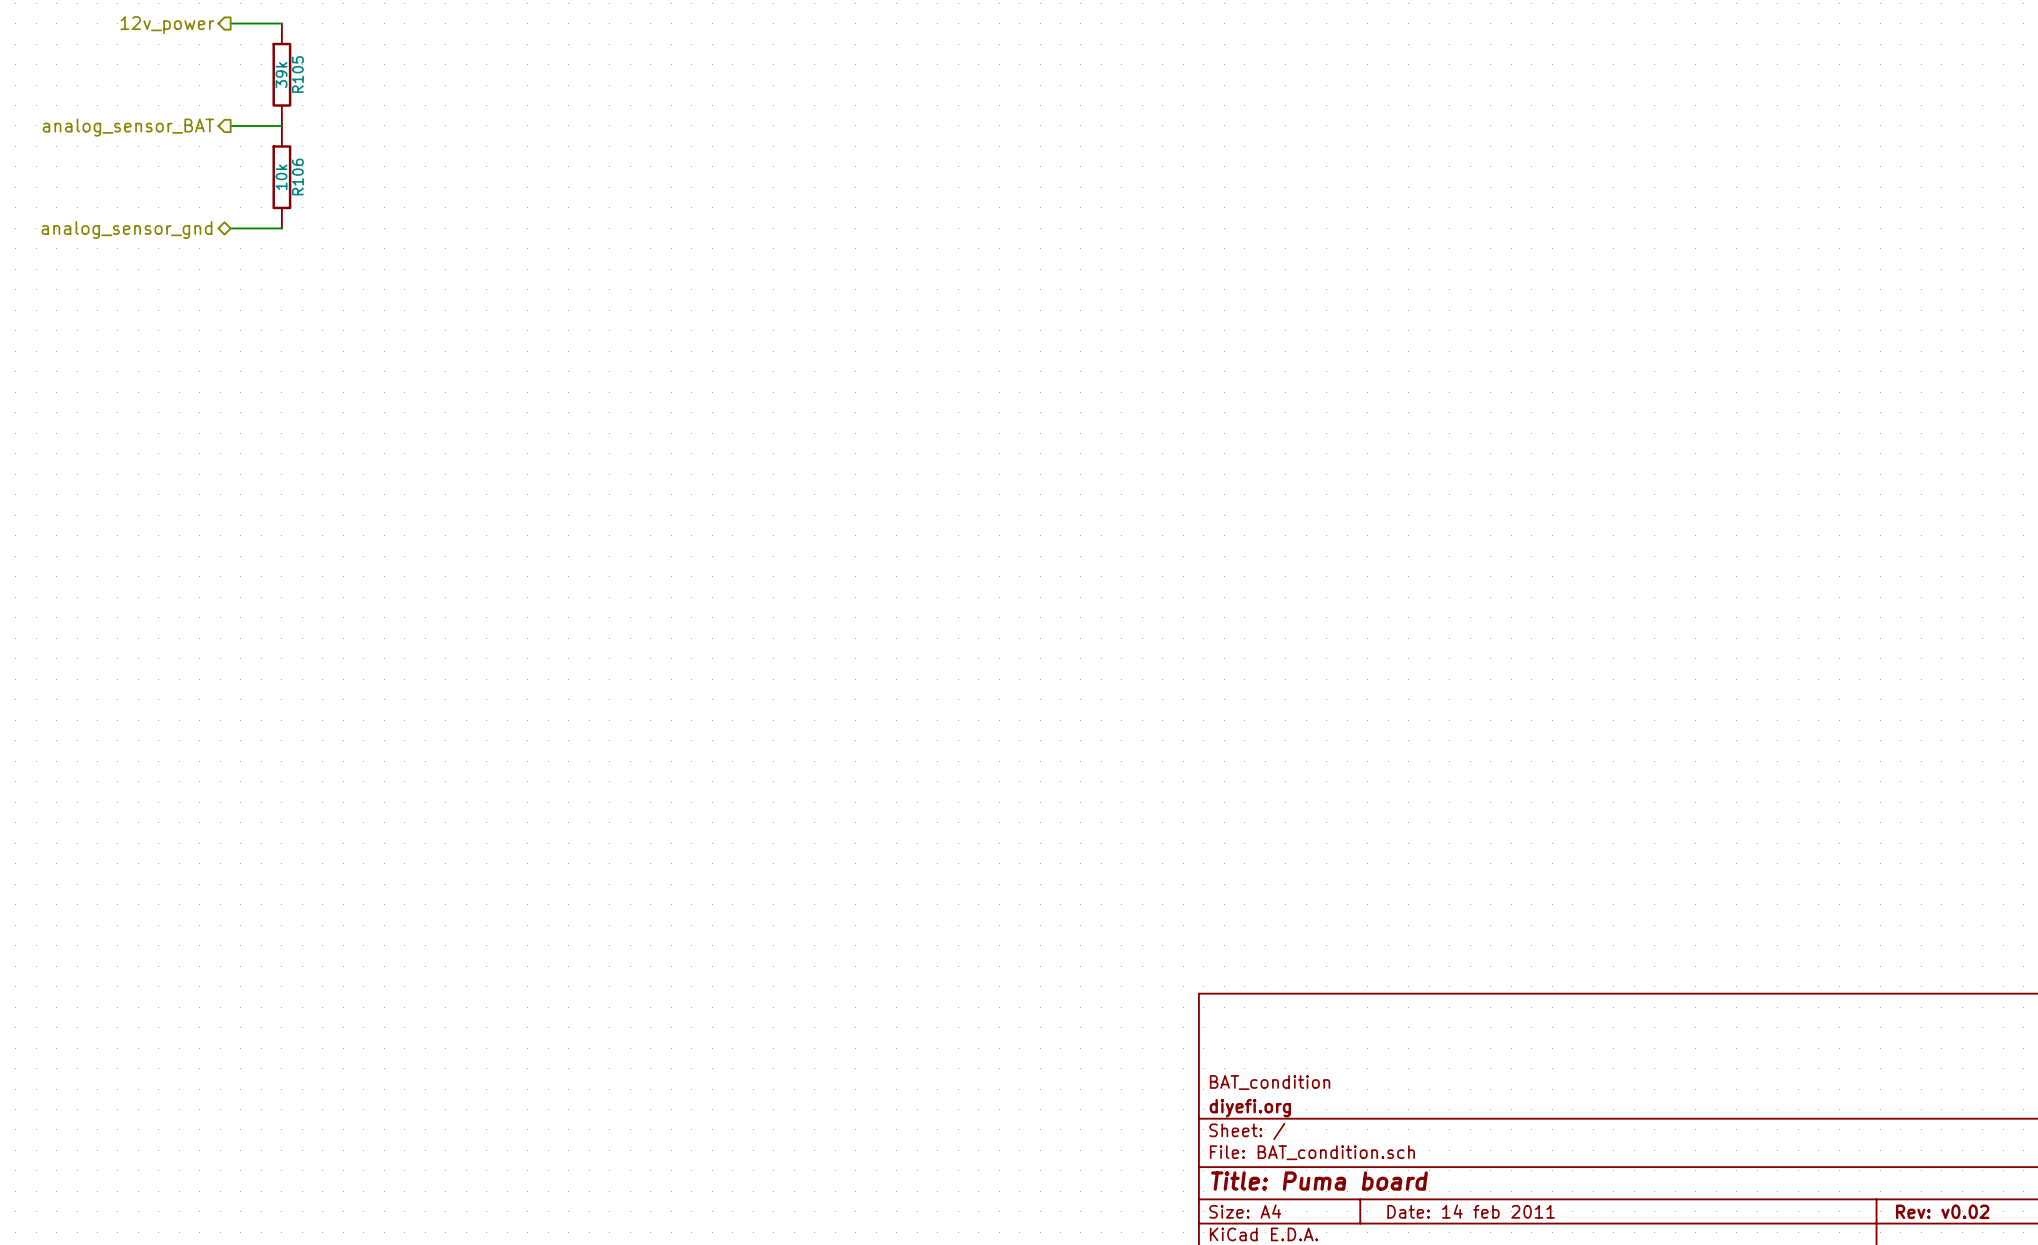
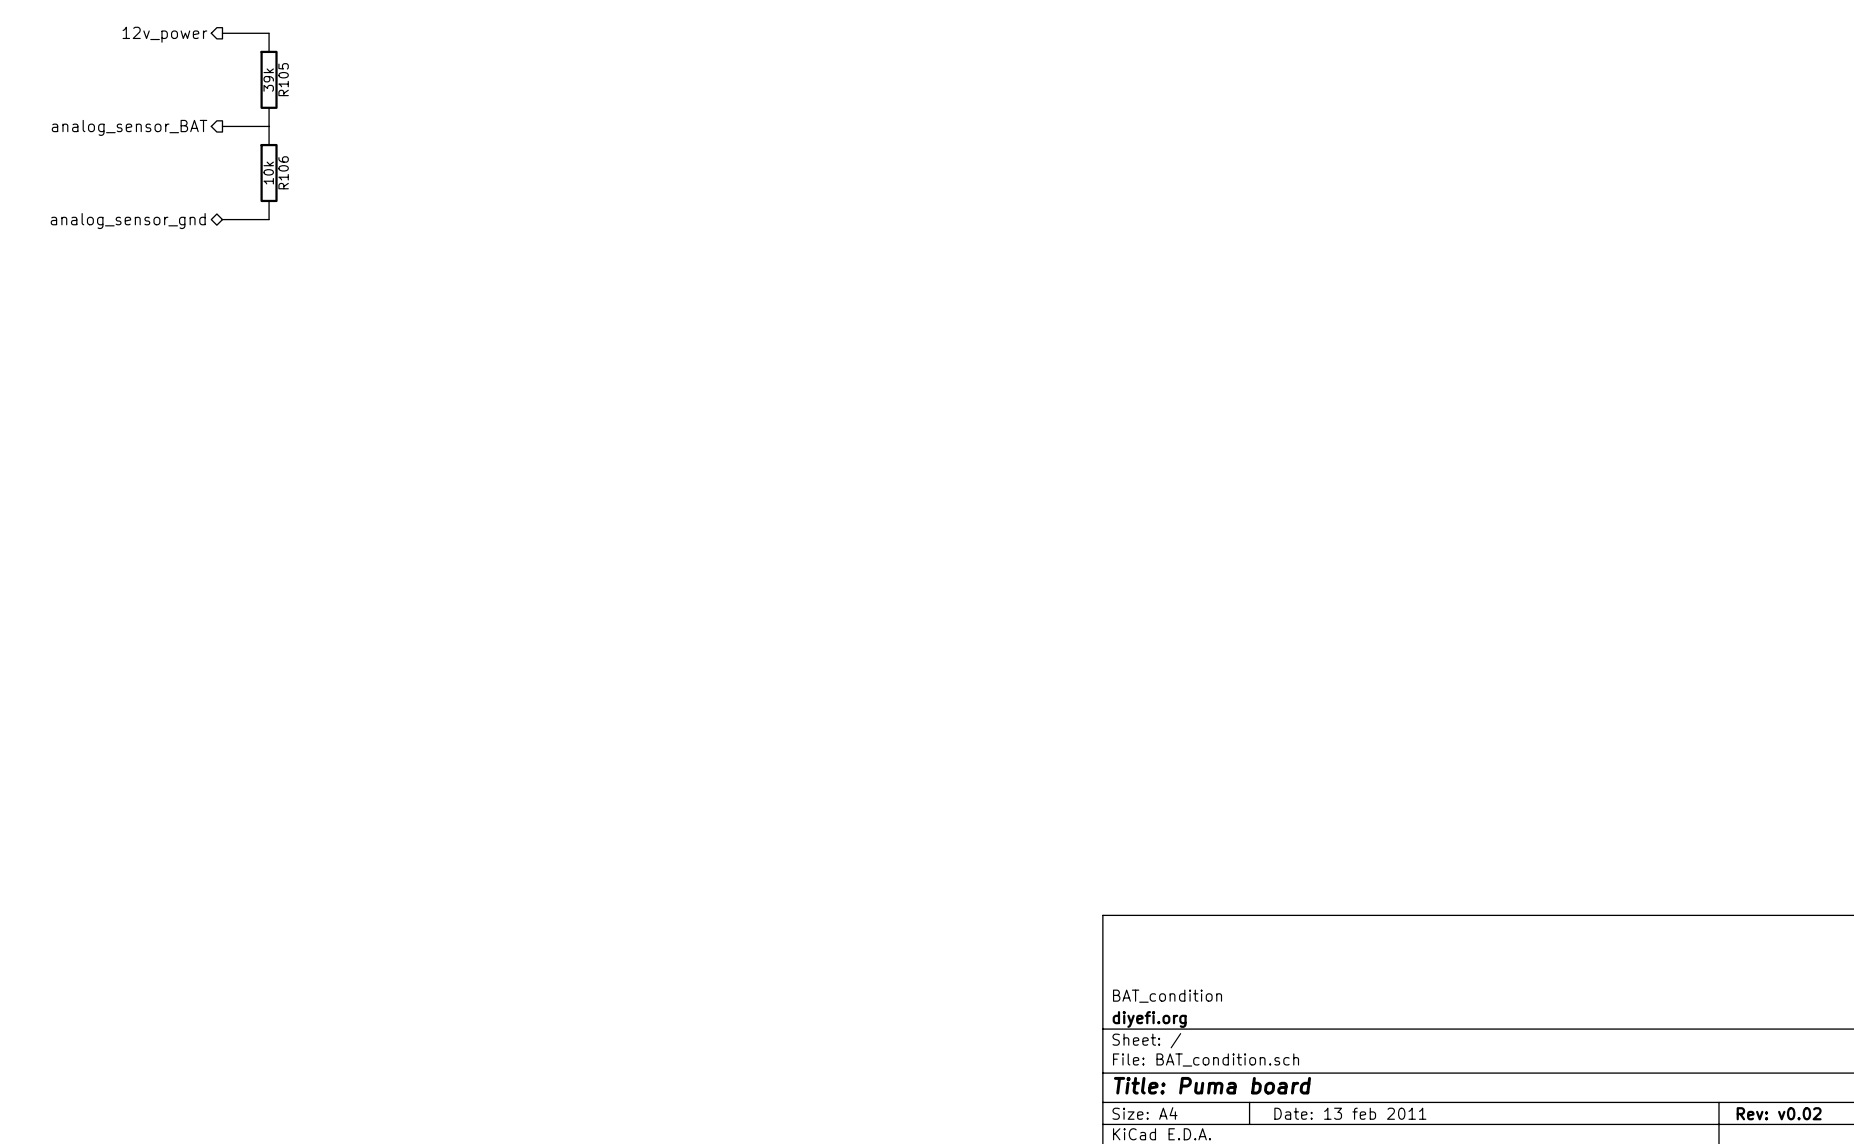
title block: Date: 14 feb 2011 (1471, 1211) -> Date: 13 feb 2011 (1350, 1113)

